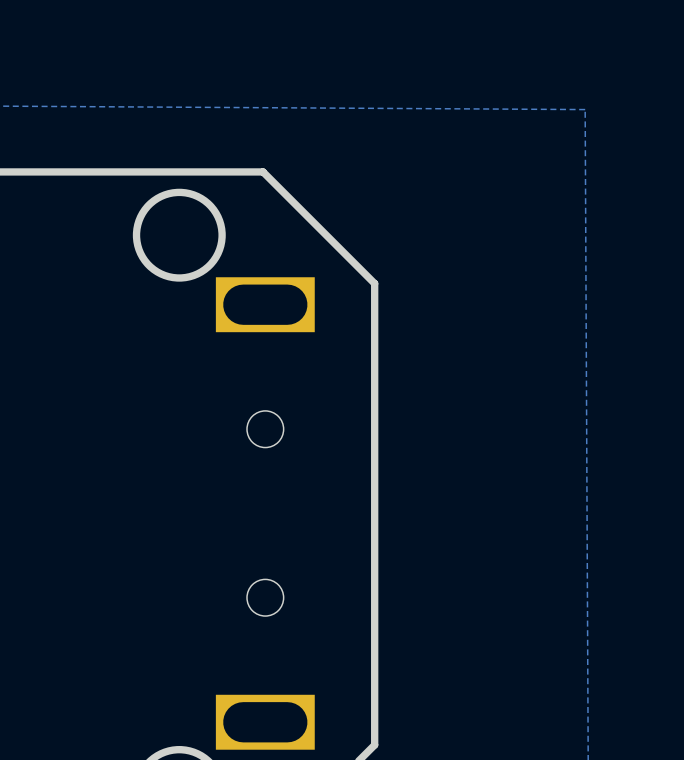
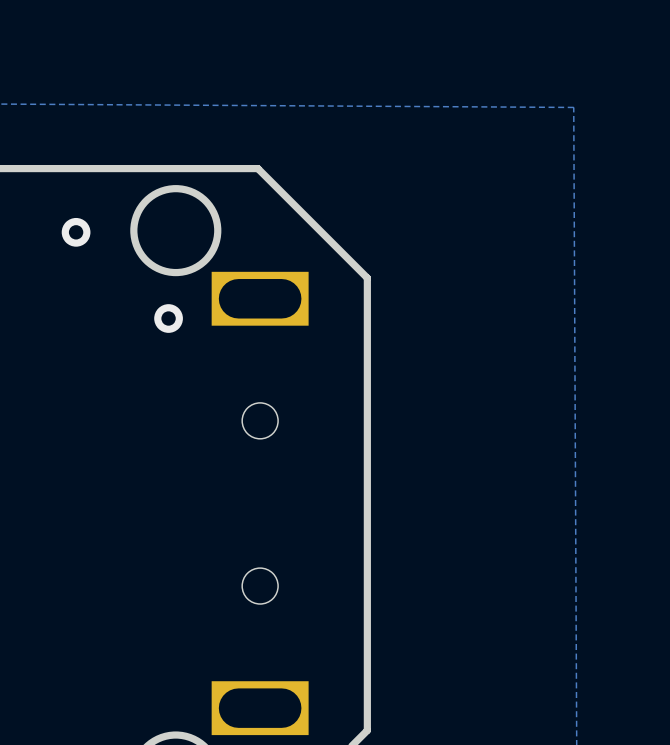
via: none -> (76, 232)
via: none -> (168, 318)

